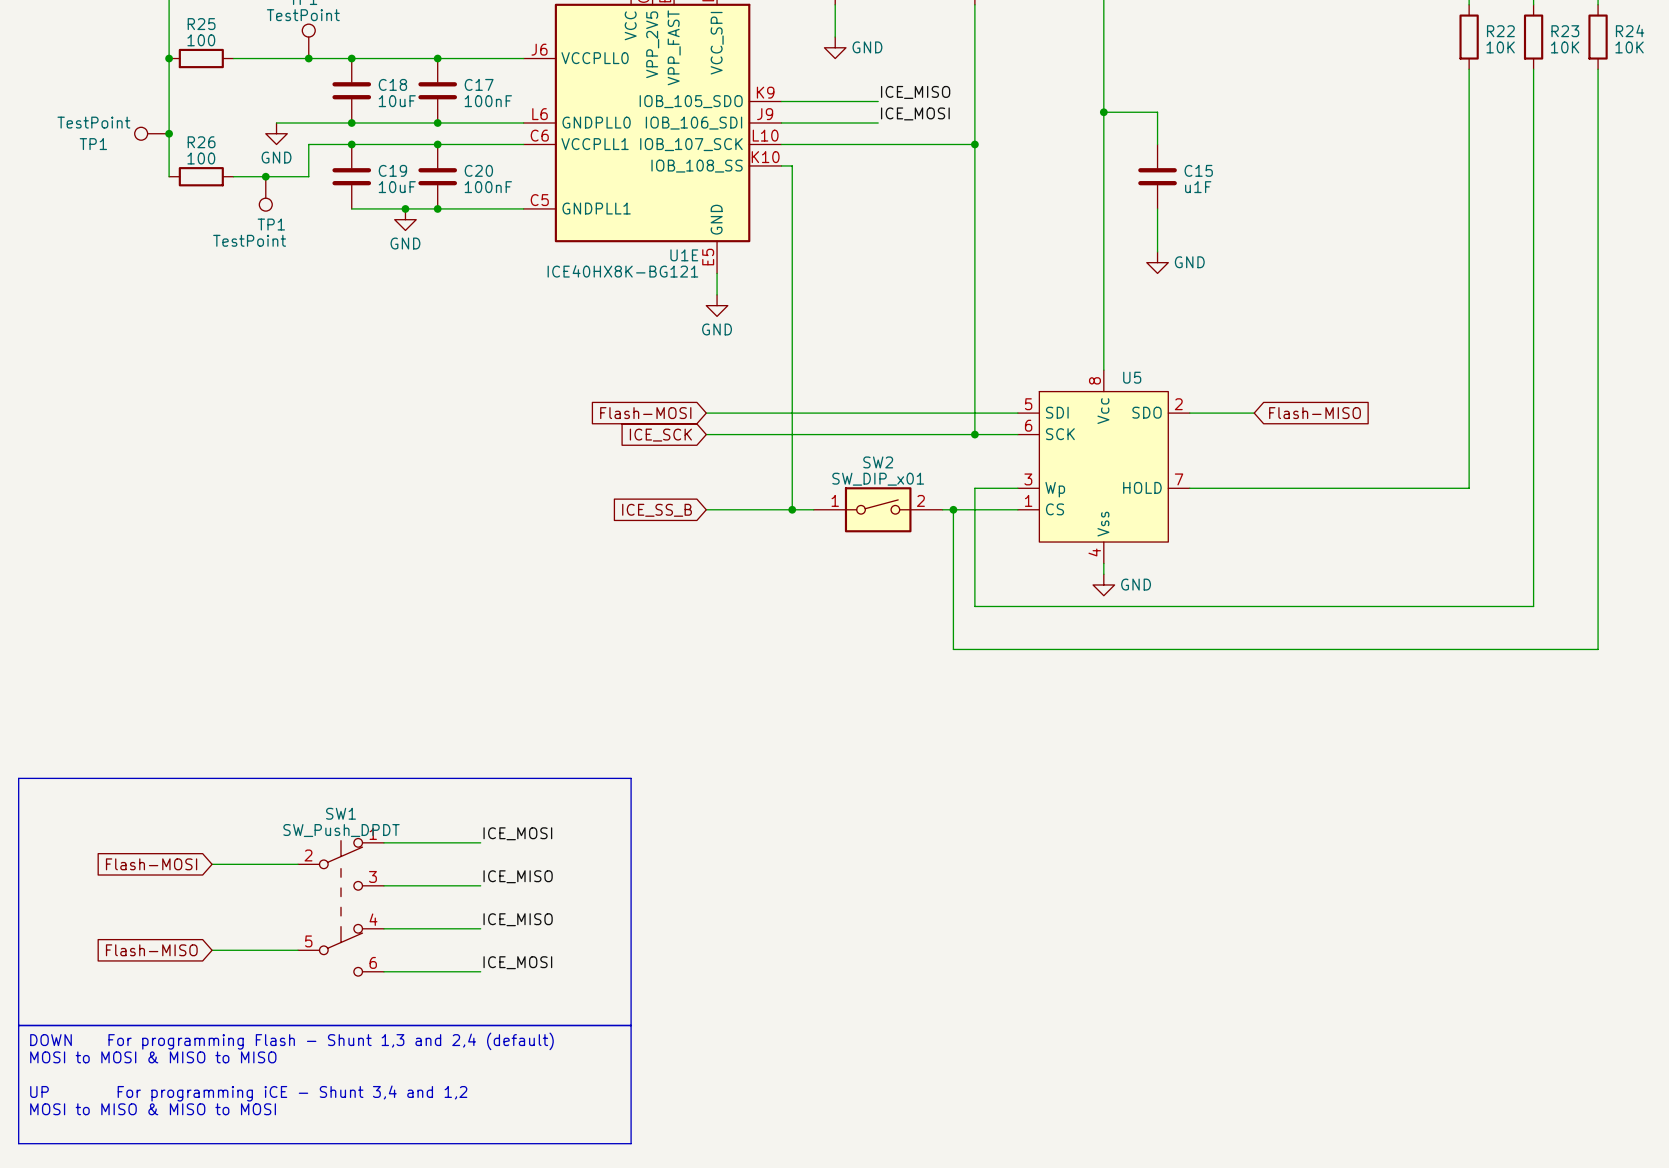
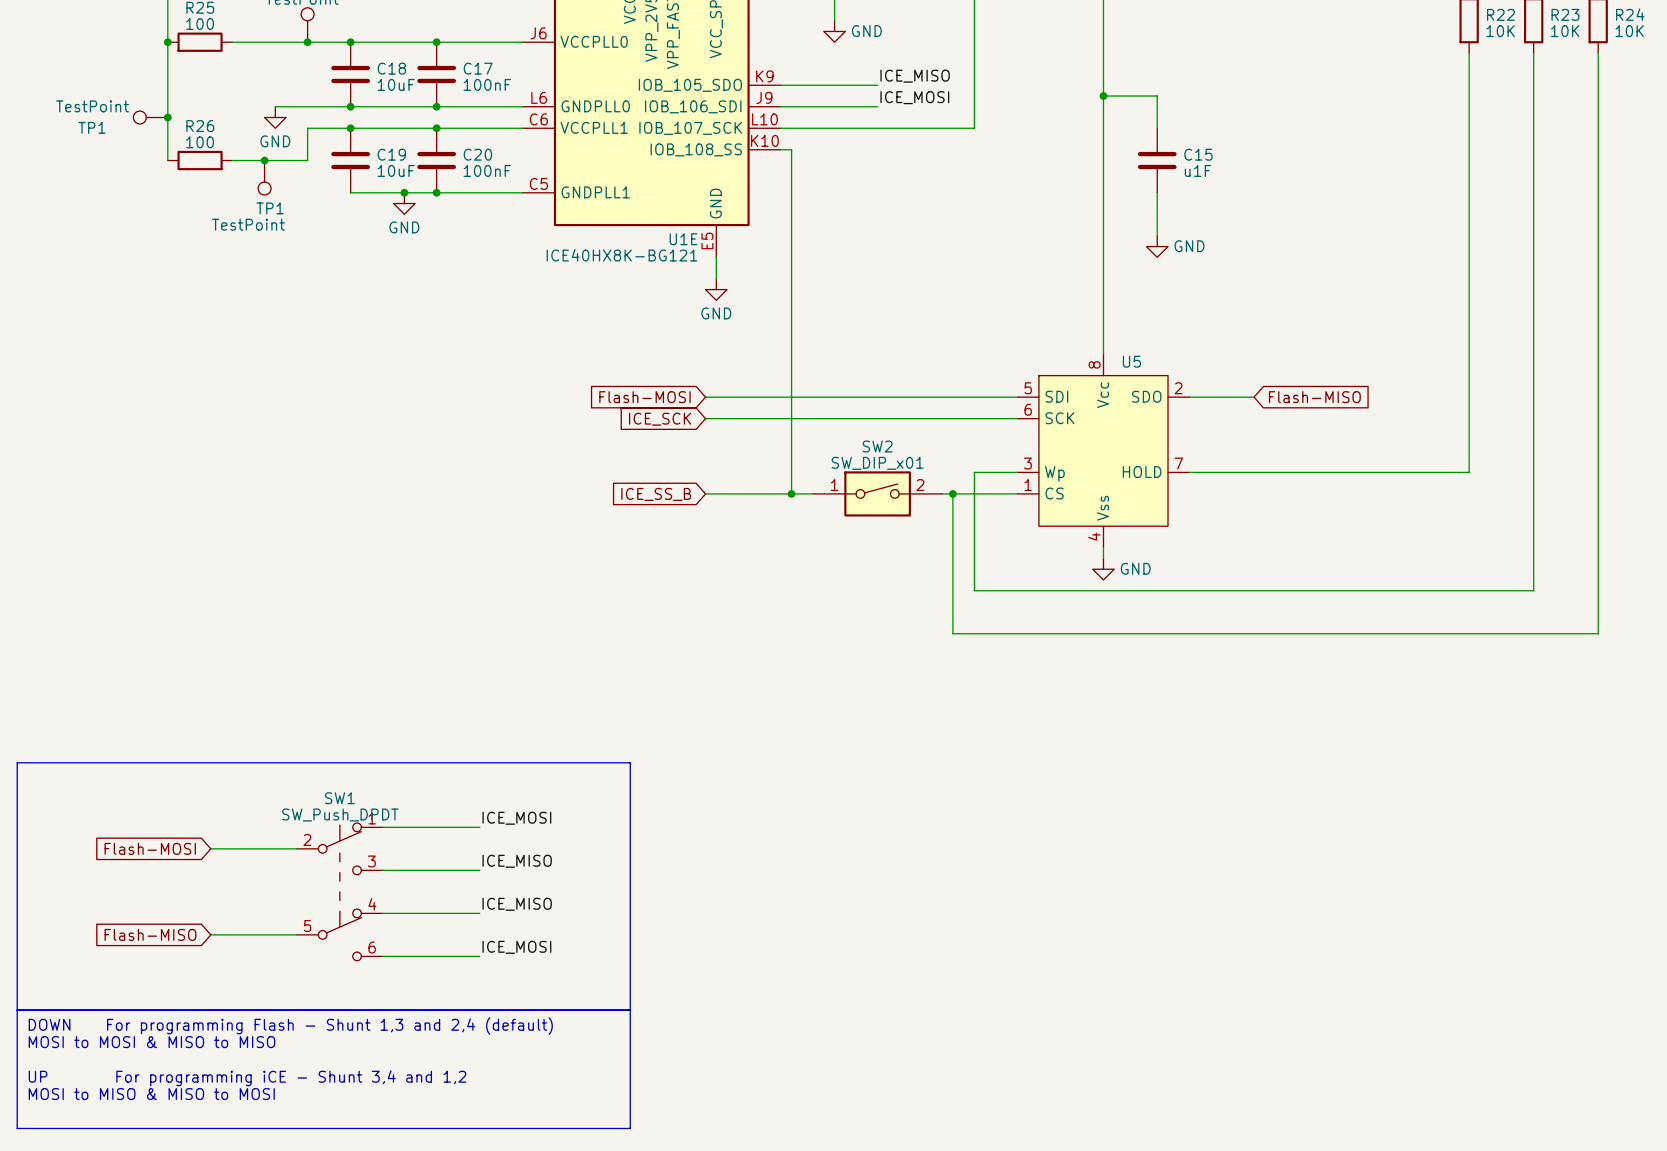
wire: (974, 144) (974, 434) -> none
junction: (974, 144) -> none
junction: (974, 434) -> none

